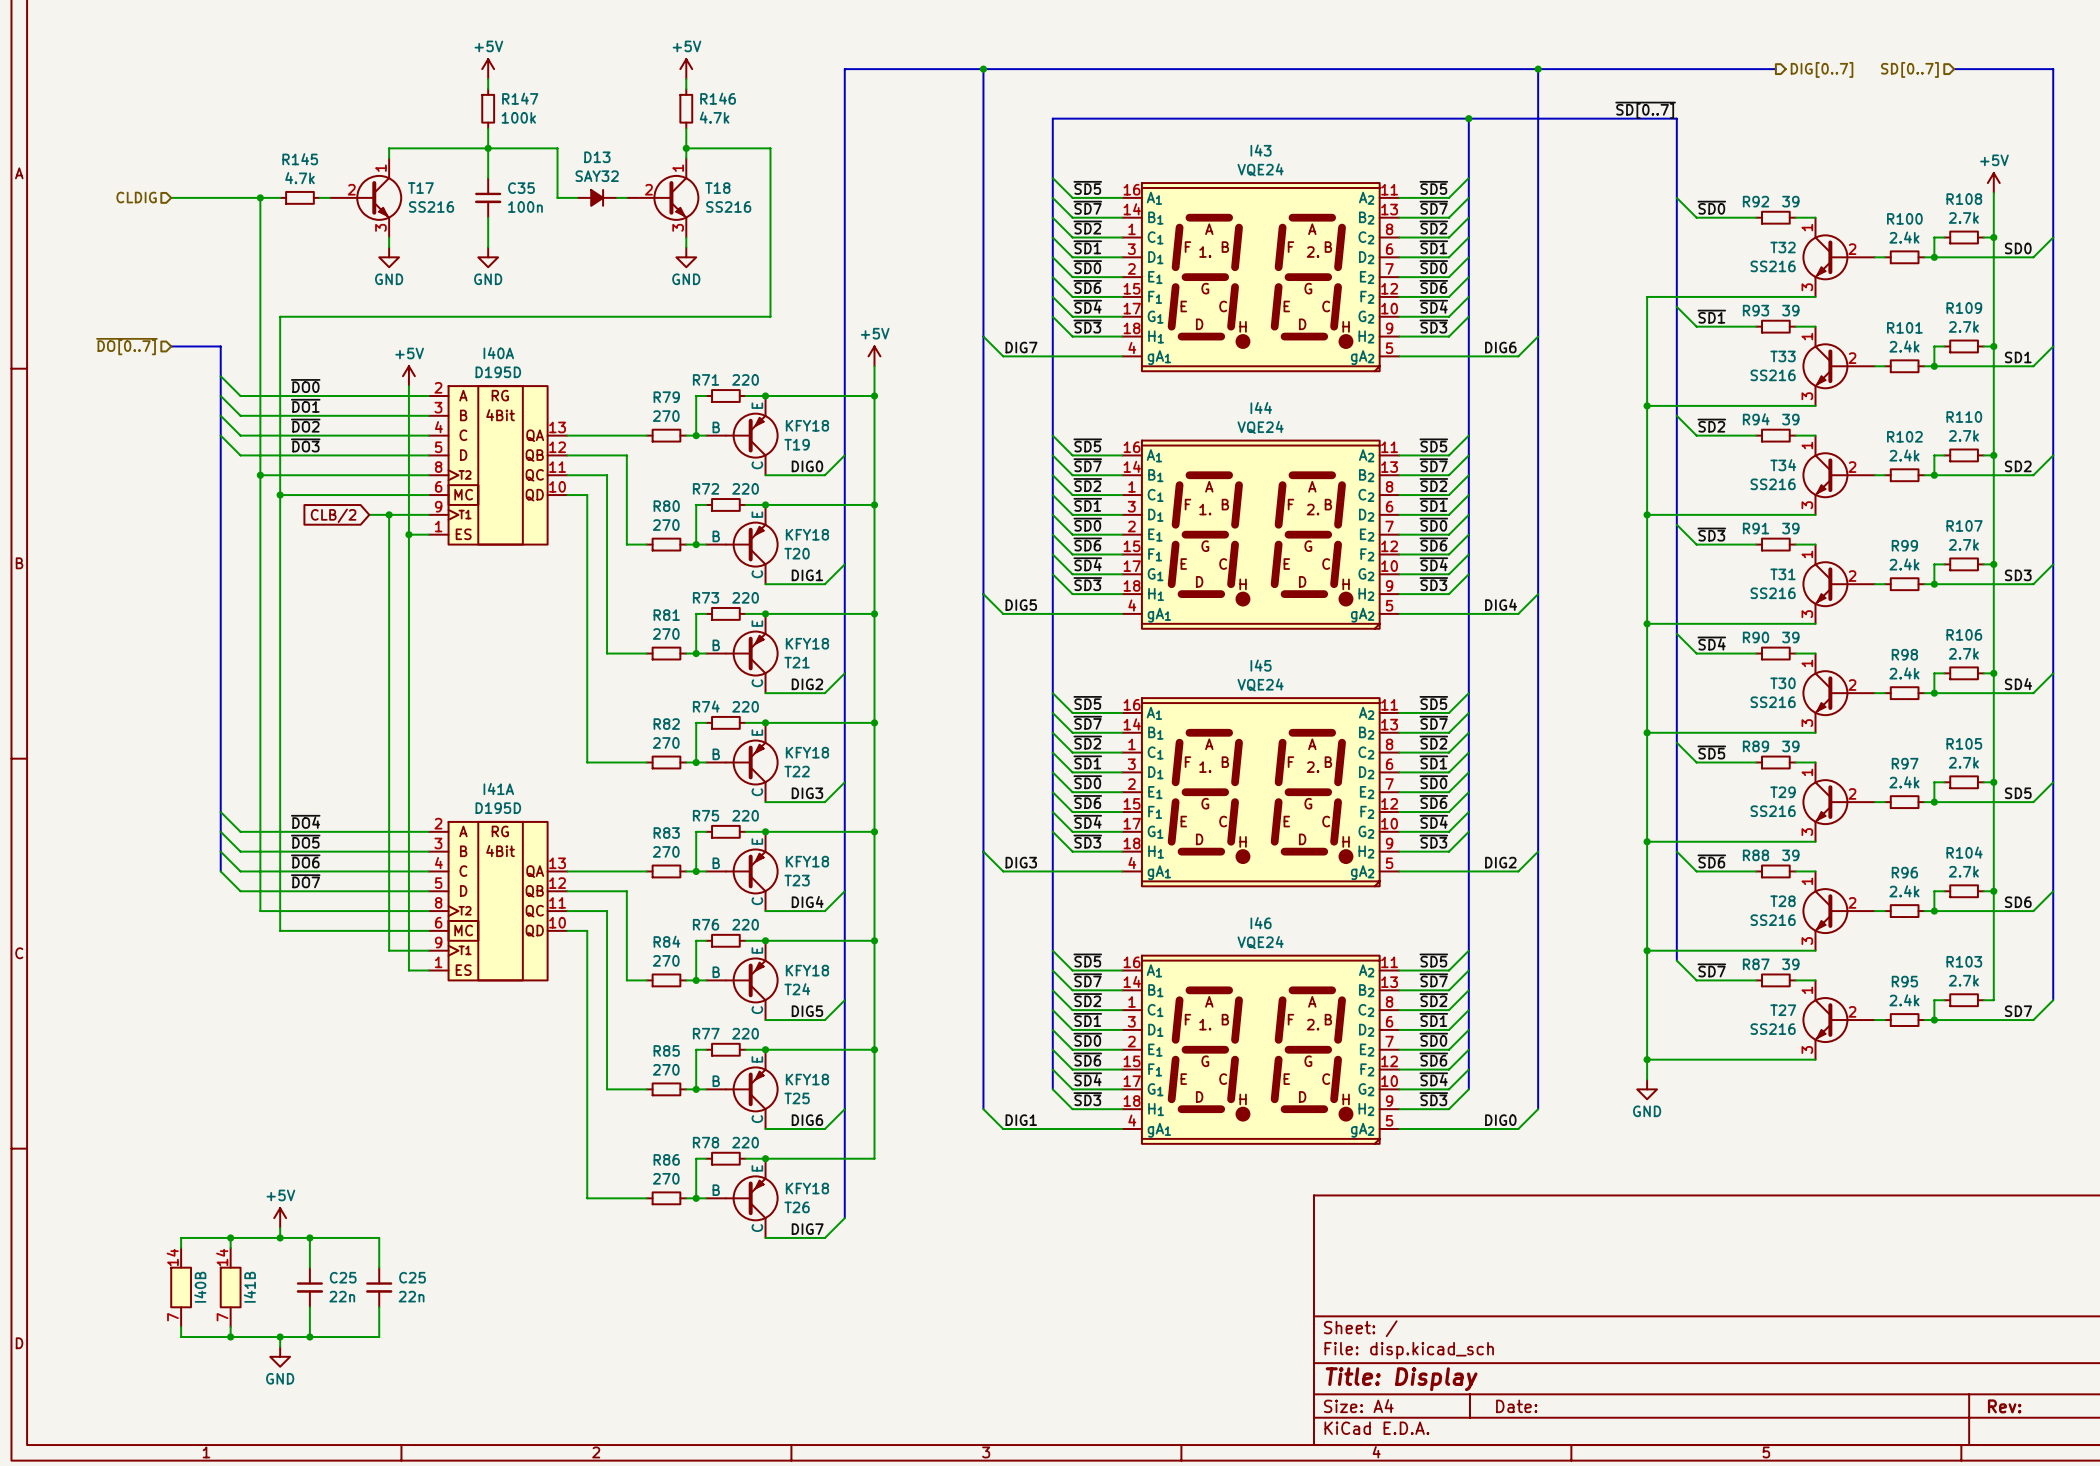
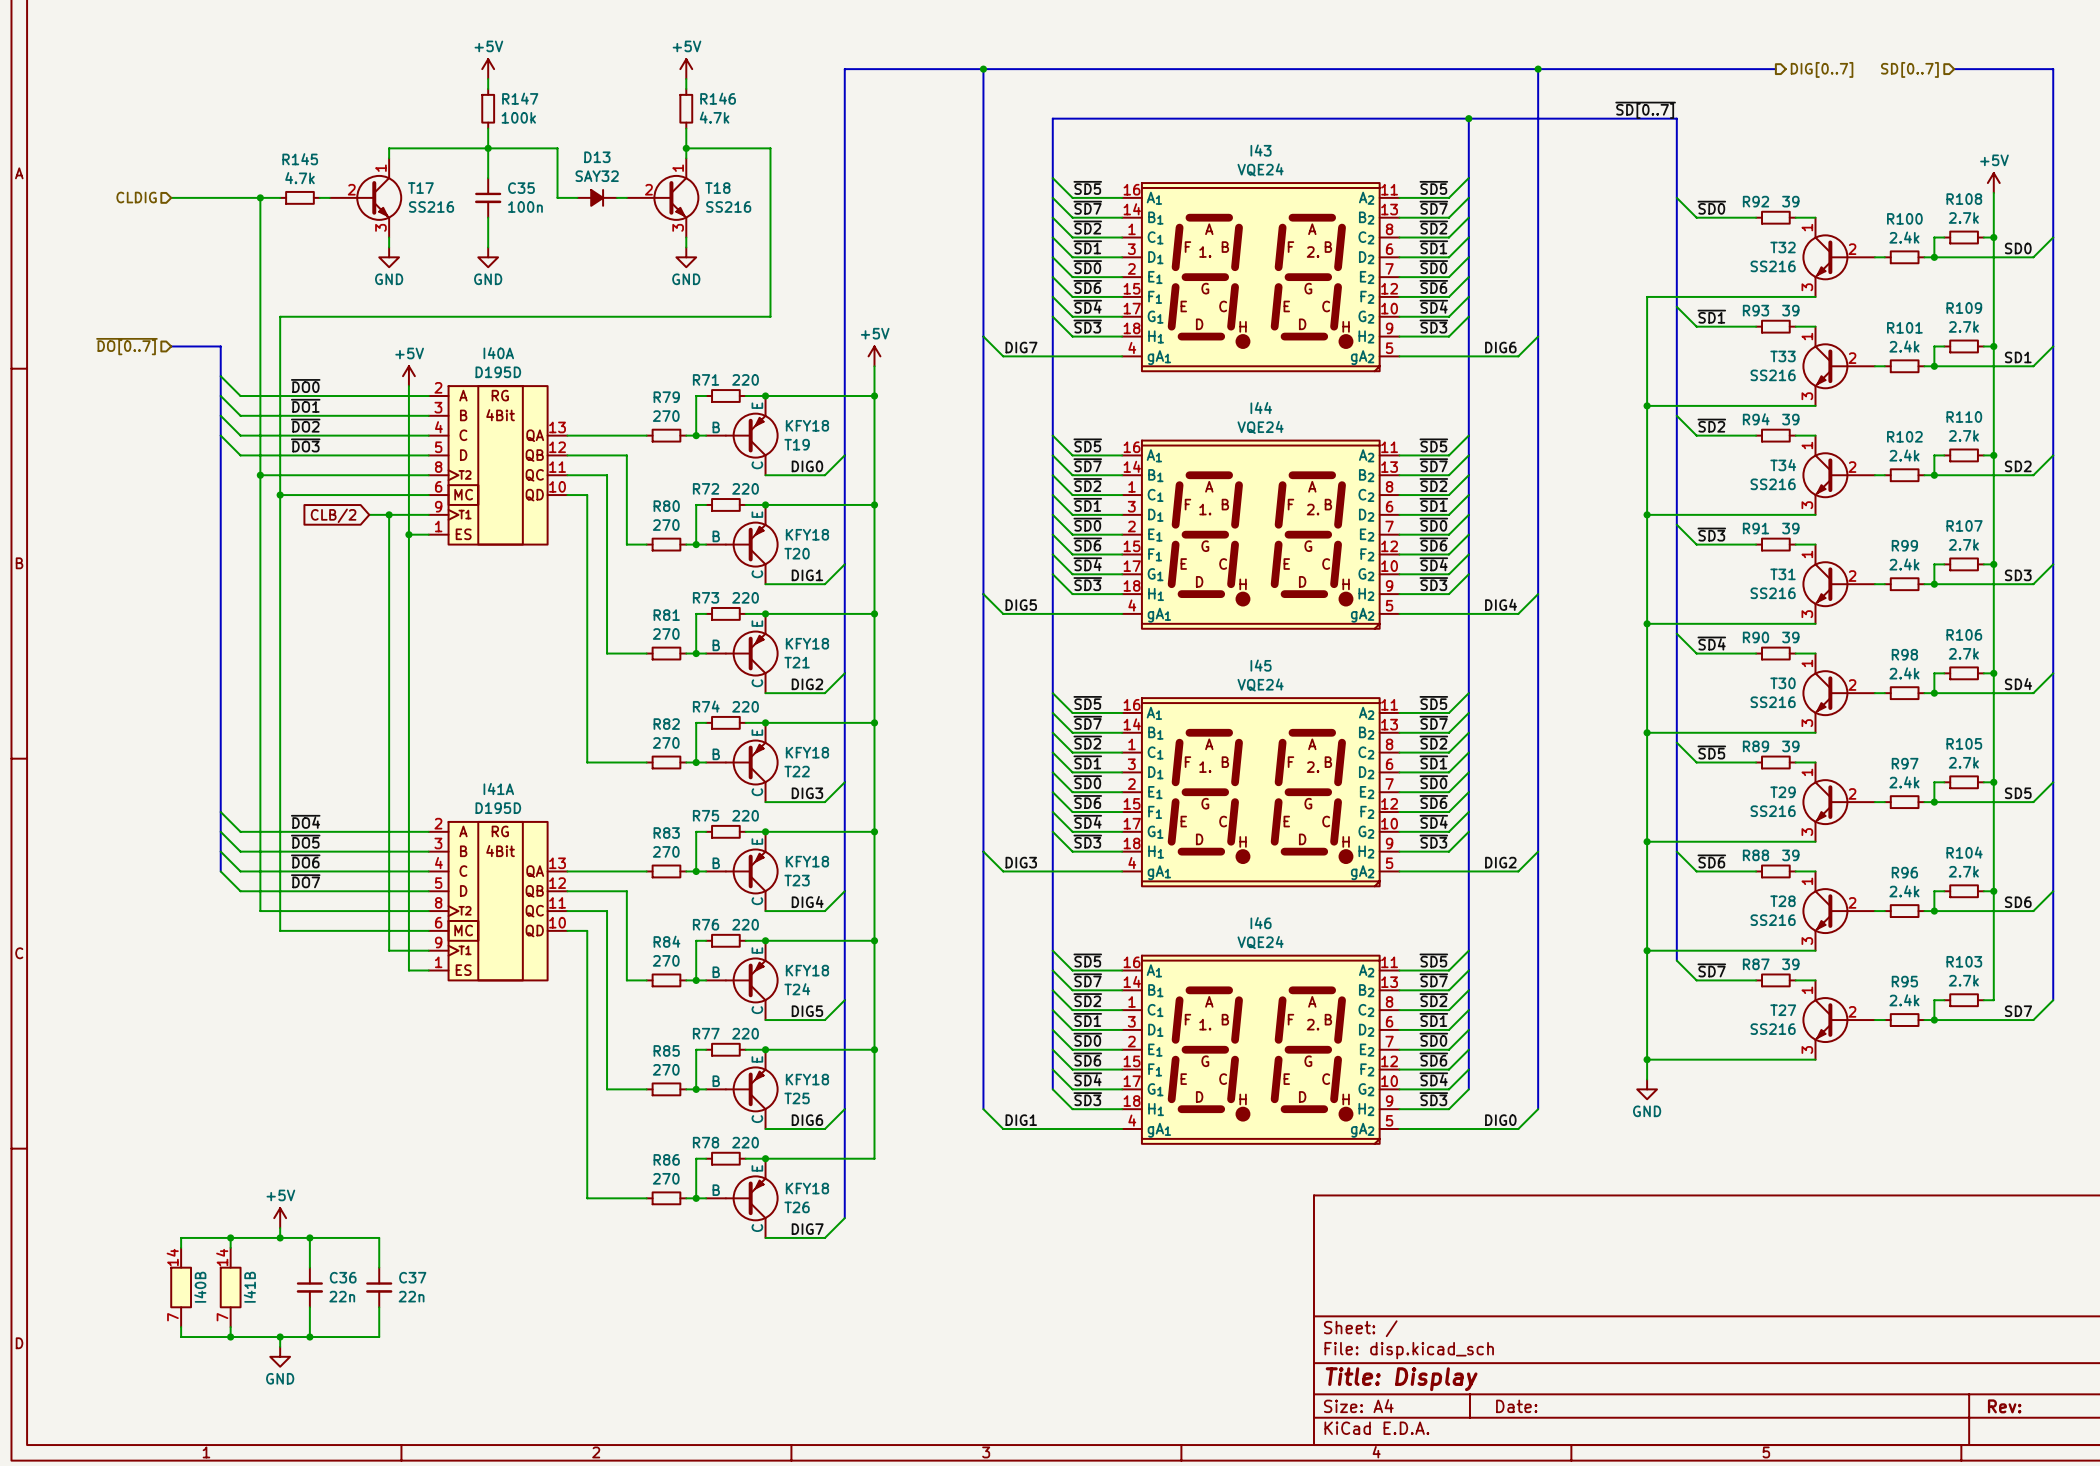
C25 name: C25 (343, 1277) -> C36 (343, 1277)
C25 name: C25 (412, 1277) -> C37 (412, 1277)

